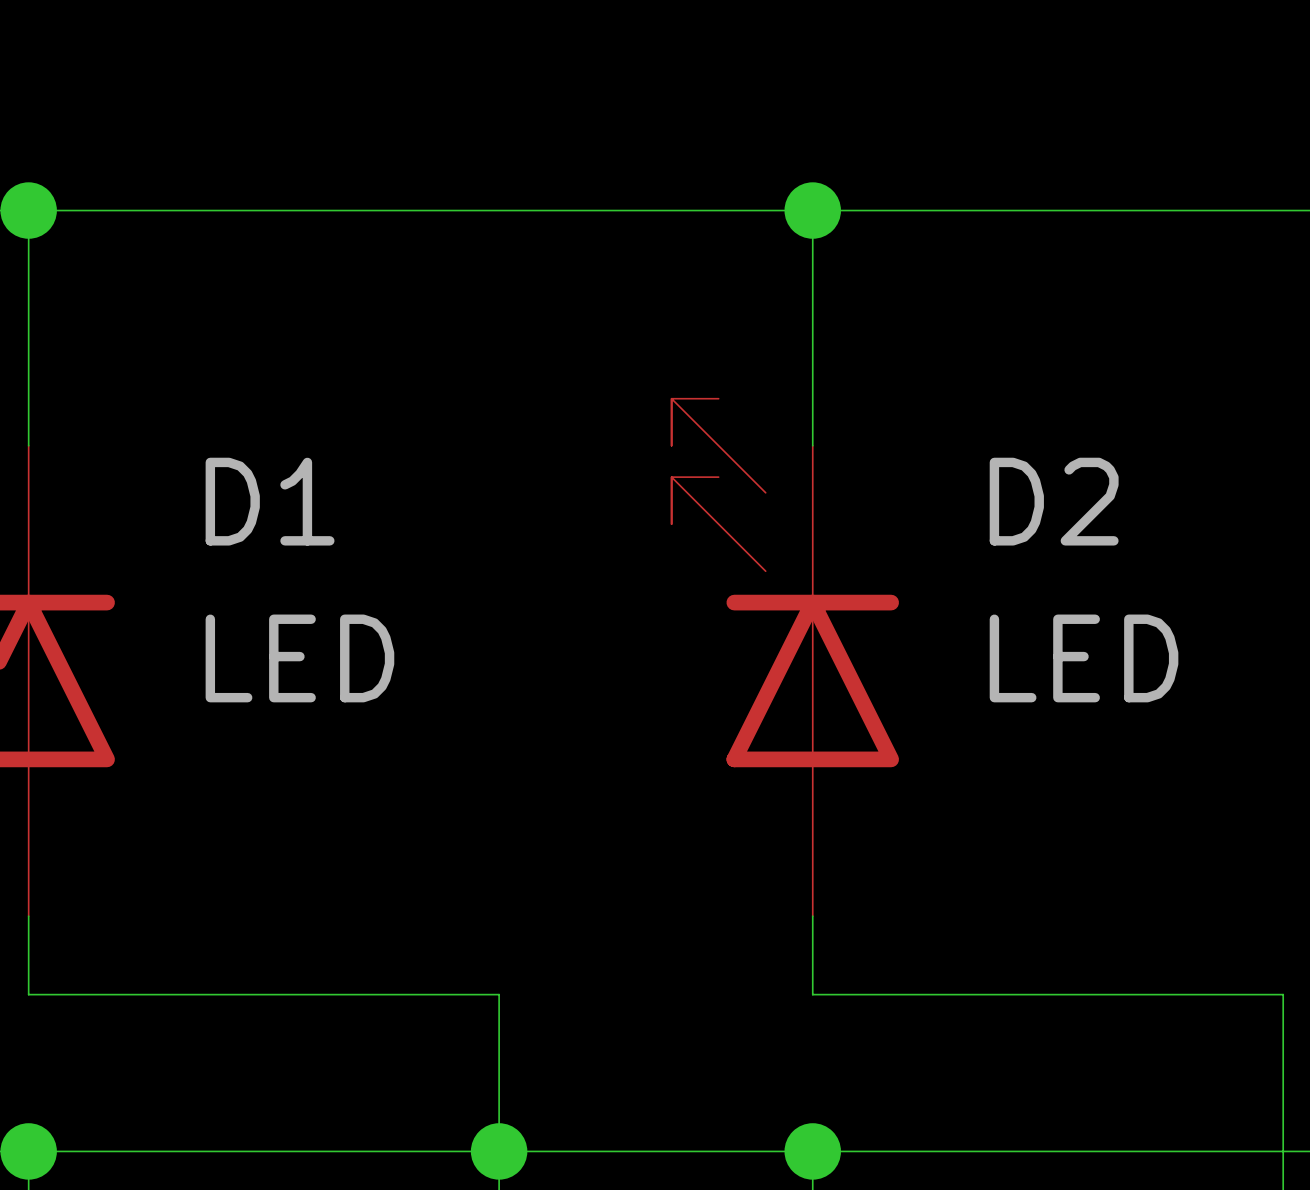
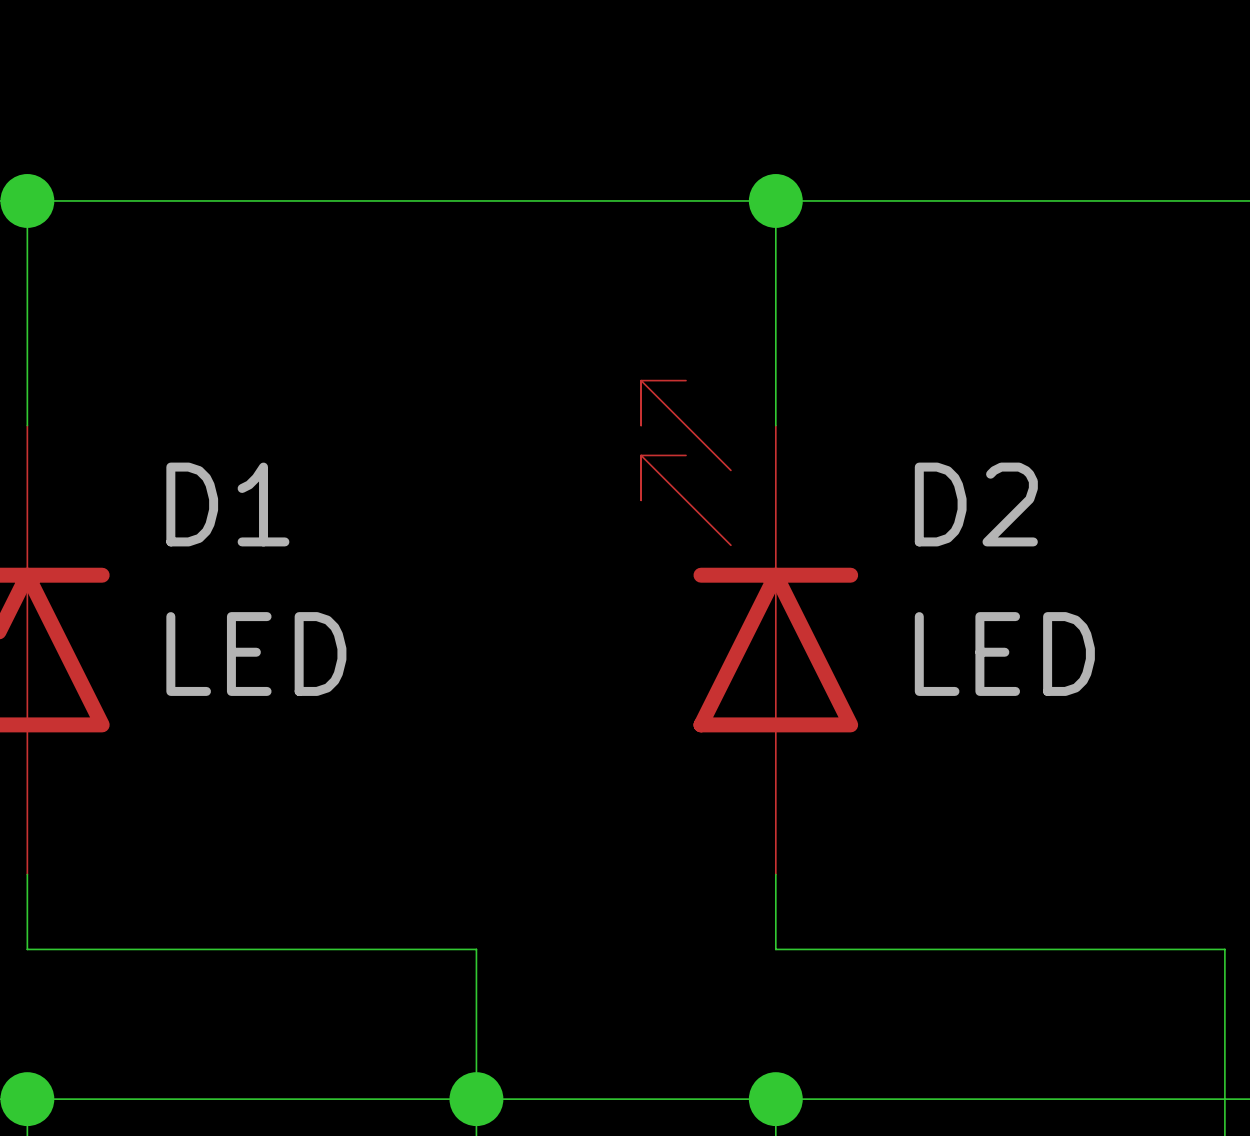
D1 name position: D1 (270, 501) -> D1 (227, 504)
D2 name position: D2 (1054, 501) -> D2 (976, 504)
D1 value position: LED (299, 658) -> LED (256, 654)
D2 value position: LED (1084, 658) -> LED (1004, 654)

